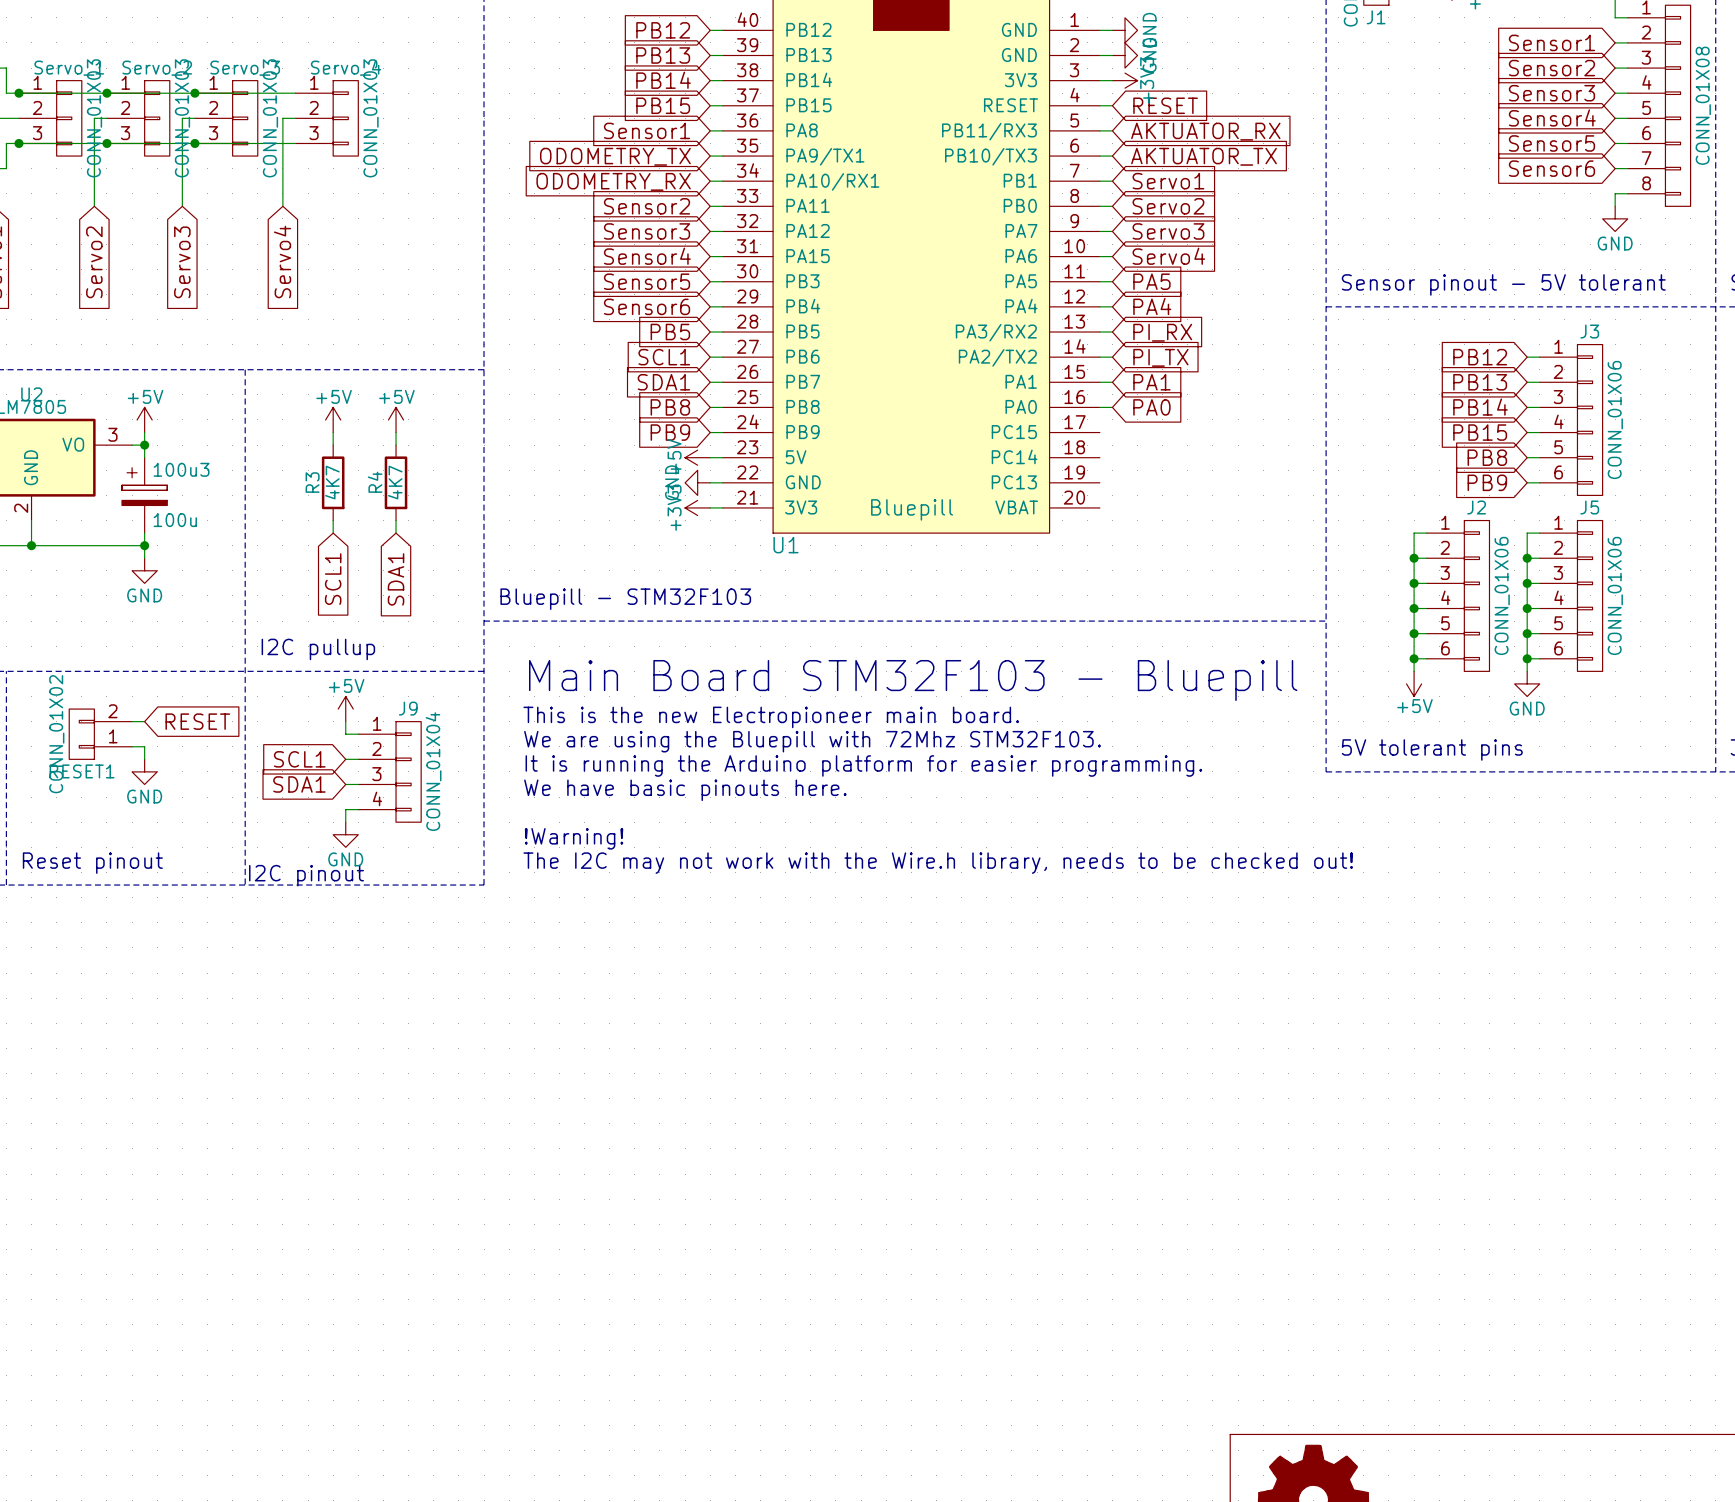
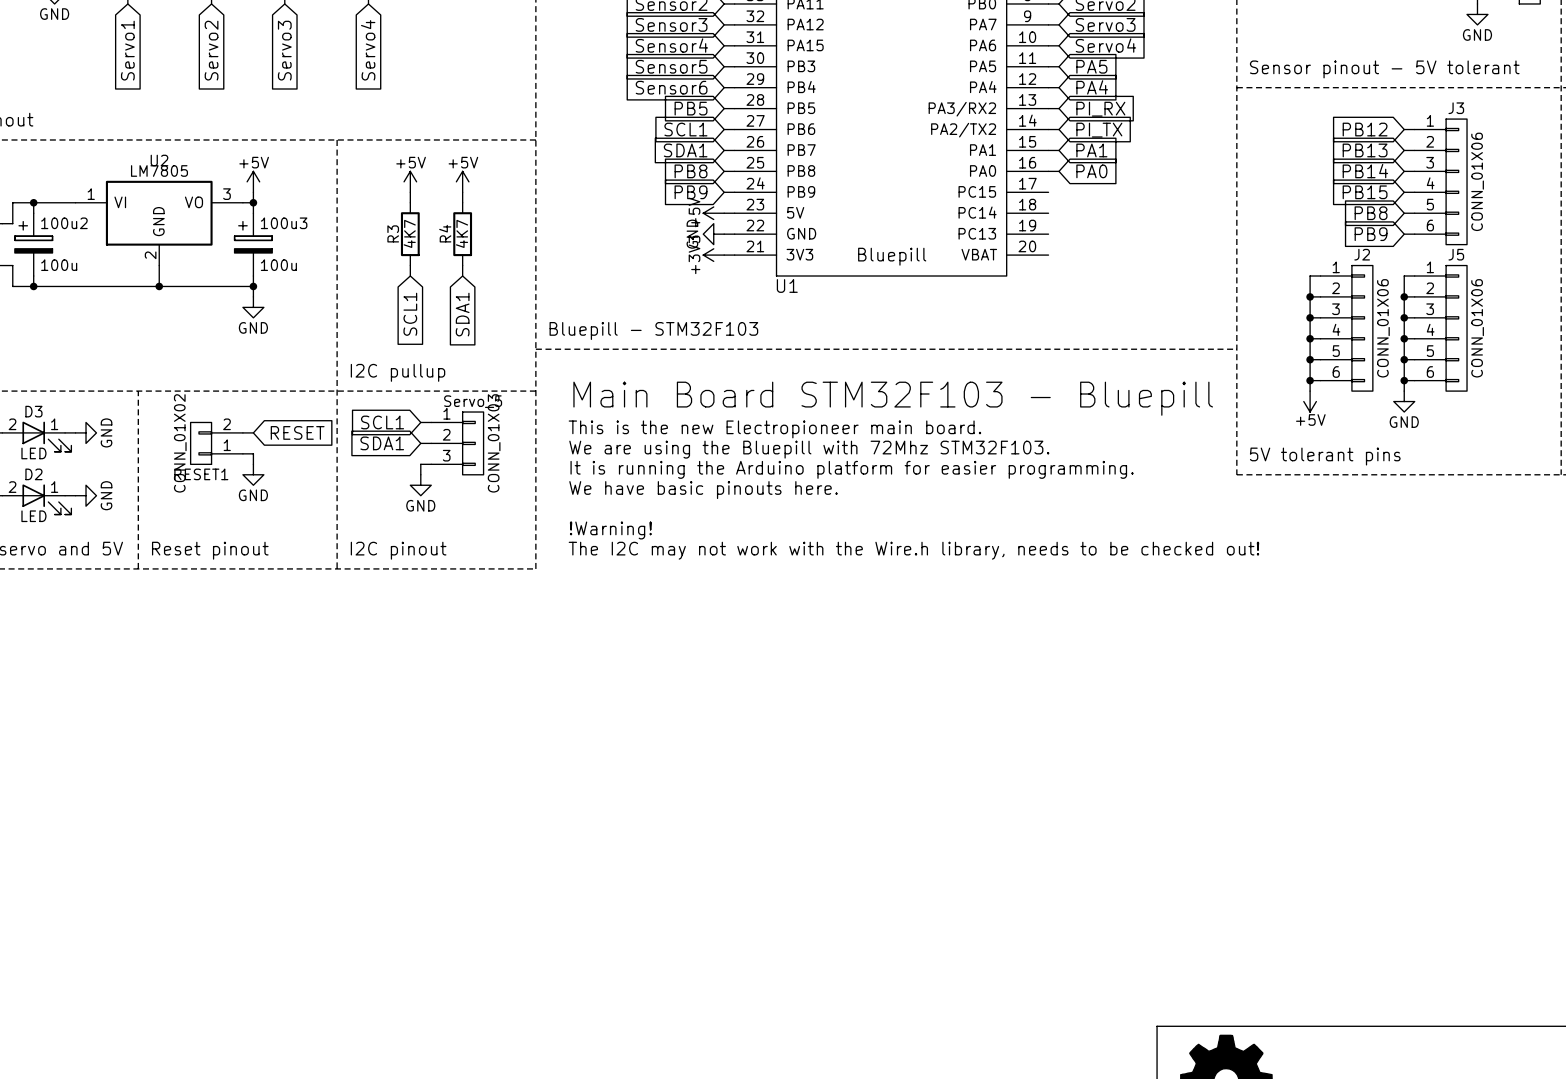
power symbol: +5V (345, 709) -> none
wire: (345, 721) (345, 734) -> (420, 464) (420, 474)
Servo_5: none -> CONN_01X03 (457, 443)
global label position: SCL1 (299, 759) -> SCL1 (382, 422)
J9: CONN_01X04 (389, 771) -> none
global label position: SDA1 (299, 784) -> SDA1 (382, 443)
wire: (358, 809) (345, 809) (345, 822) -> none
power symbol position: GND (345, 834) -> GND (420, 485)
text position: I2C pinout (306, 875) -> I2C pinout (398, 550)

